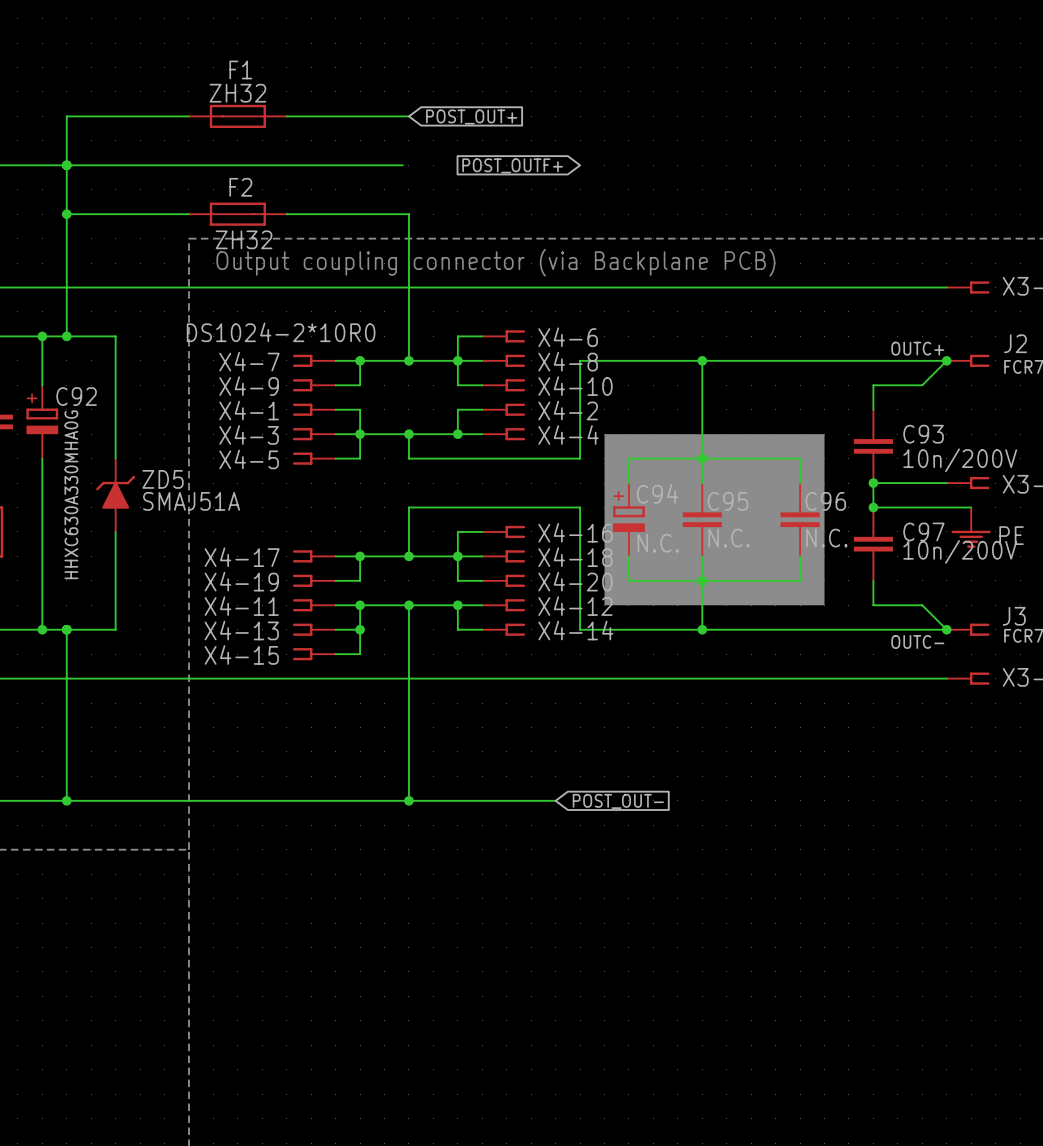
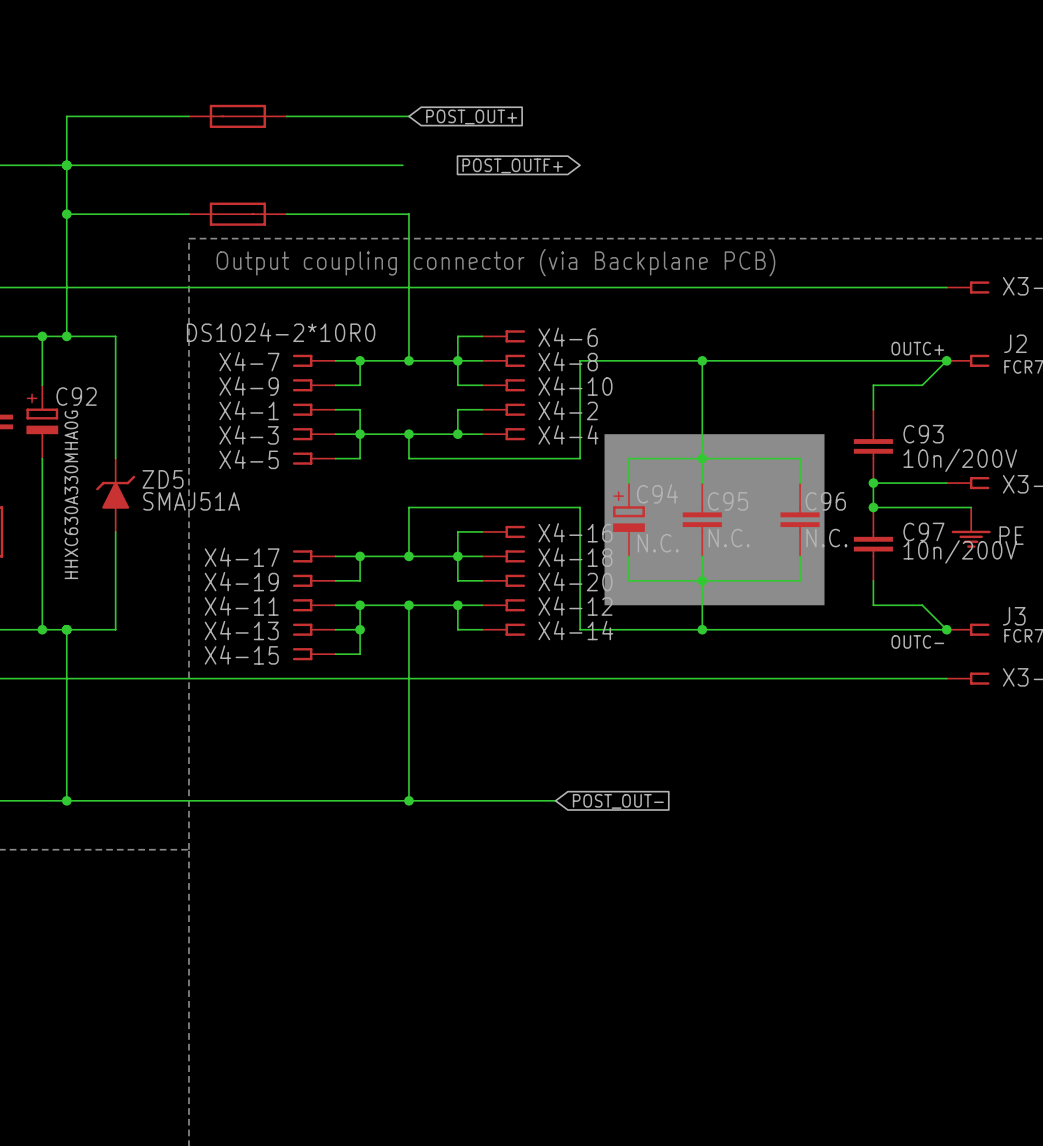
F1 name: F1 (240, 69) -> none
F1 value: ZH32 (237, 93) -> none
F2 name: F2 (240, 187) -> none
F2 value: ZH32 (244, 239) -> none

